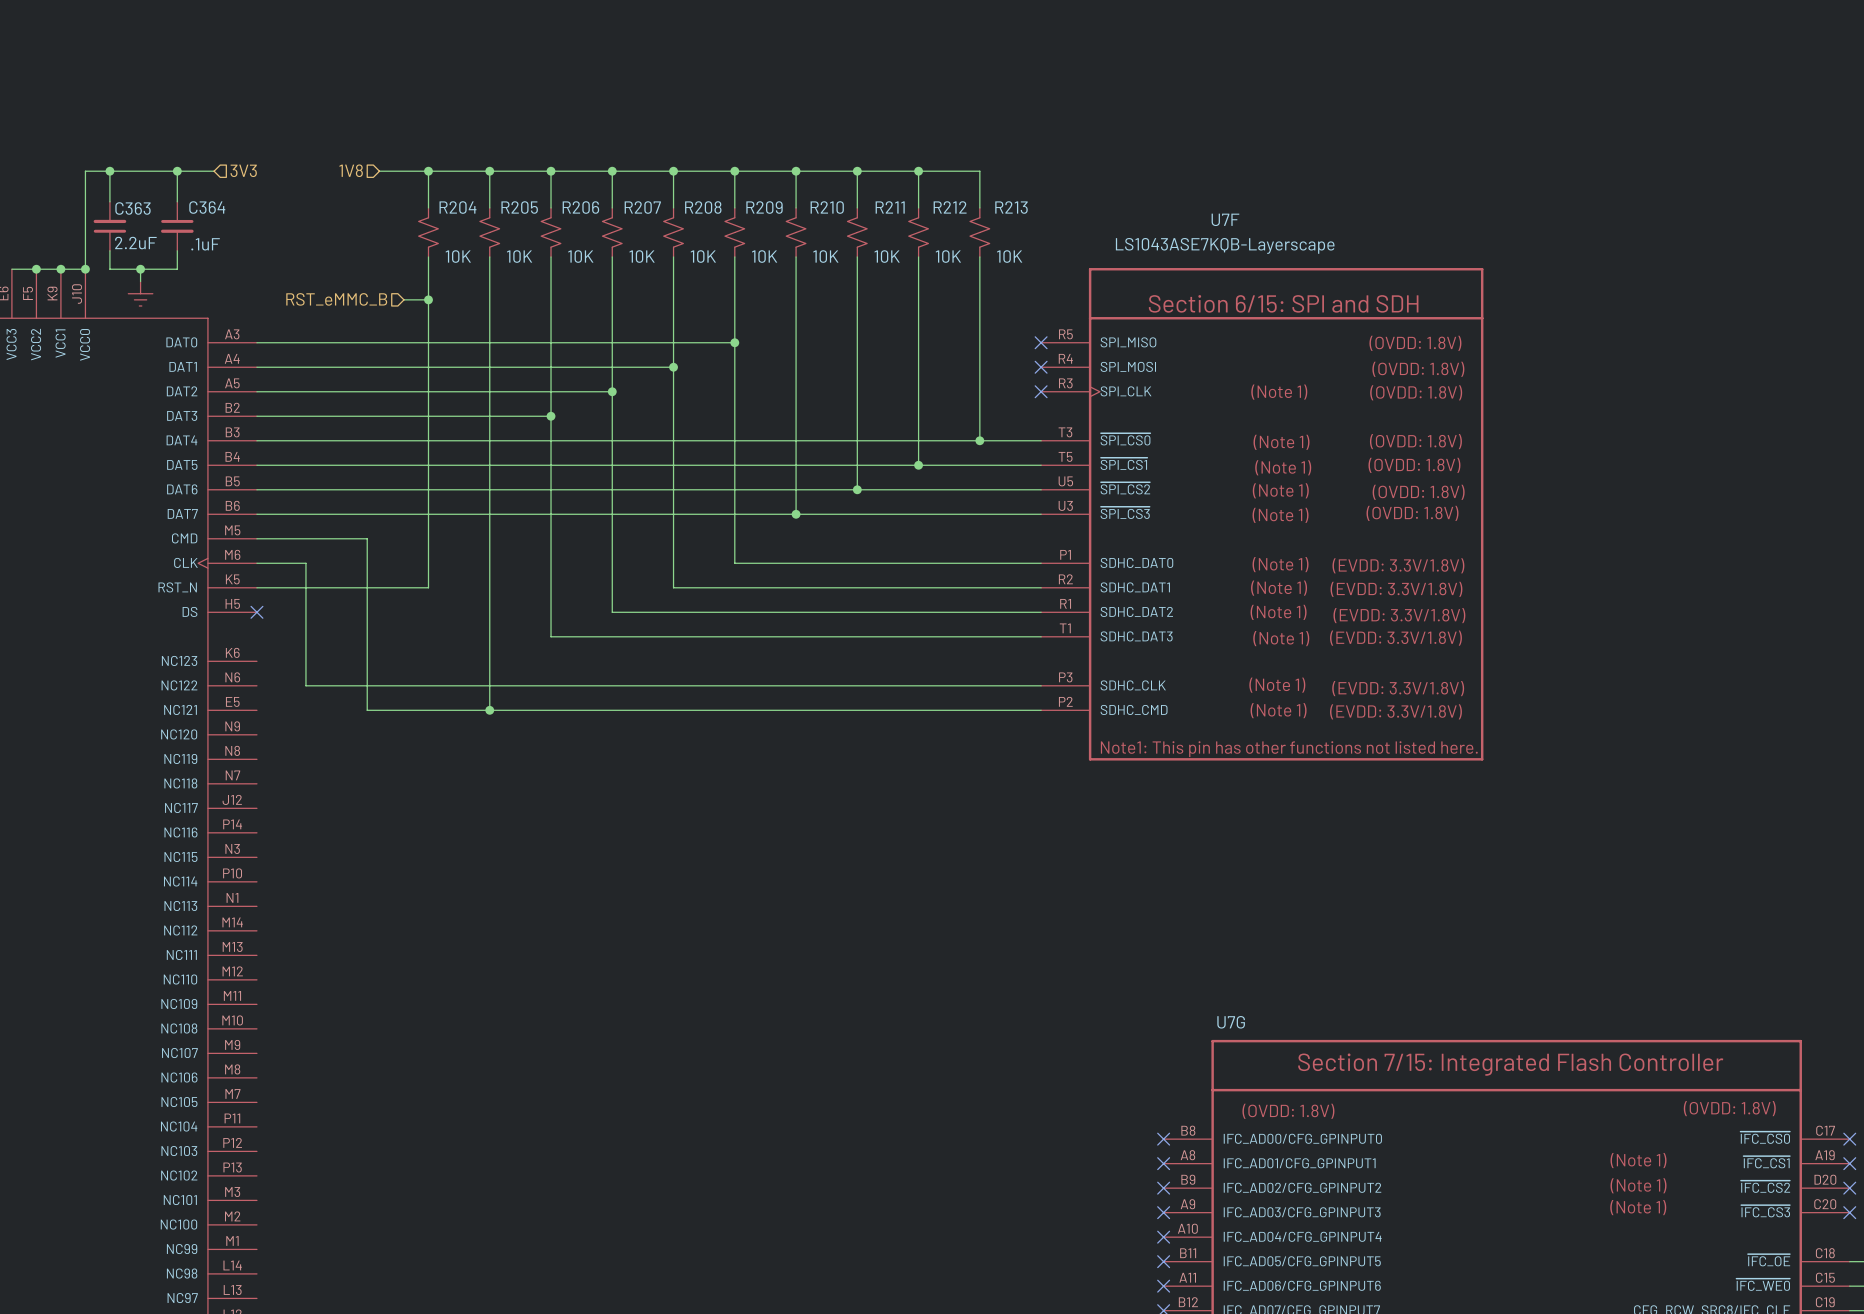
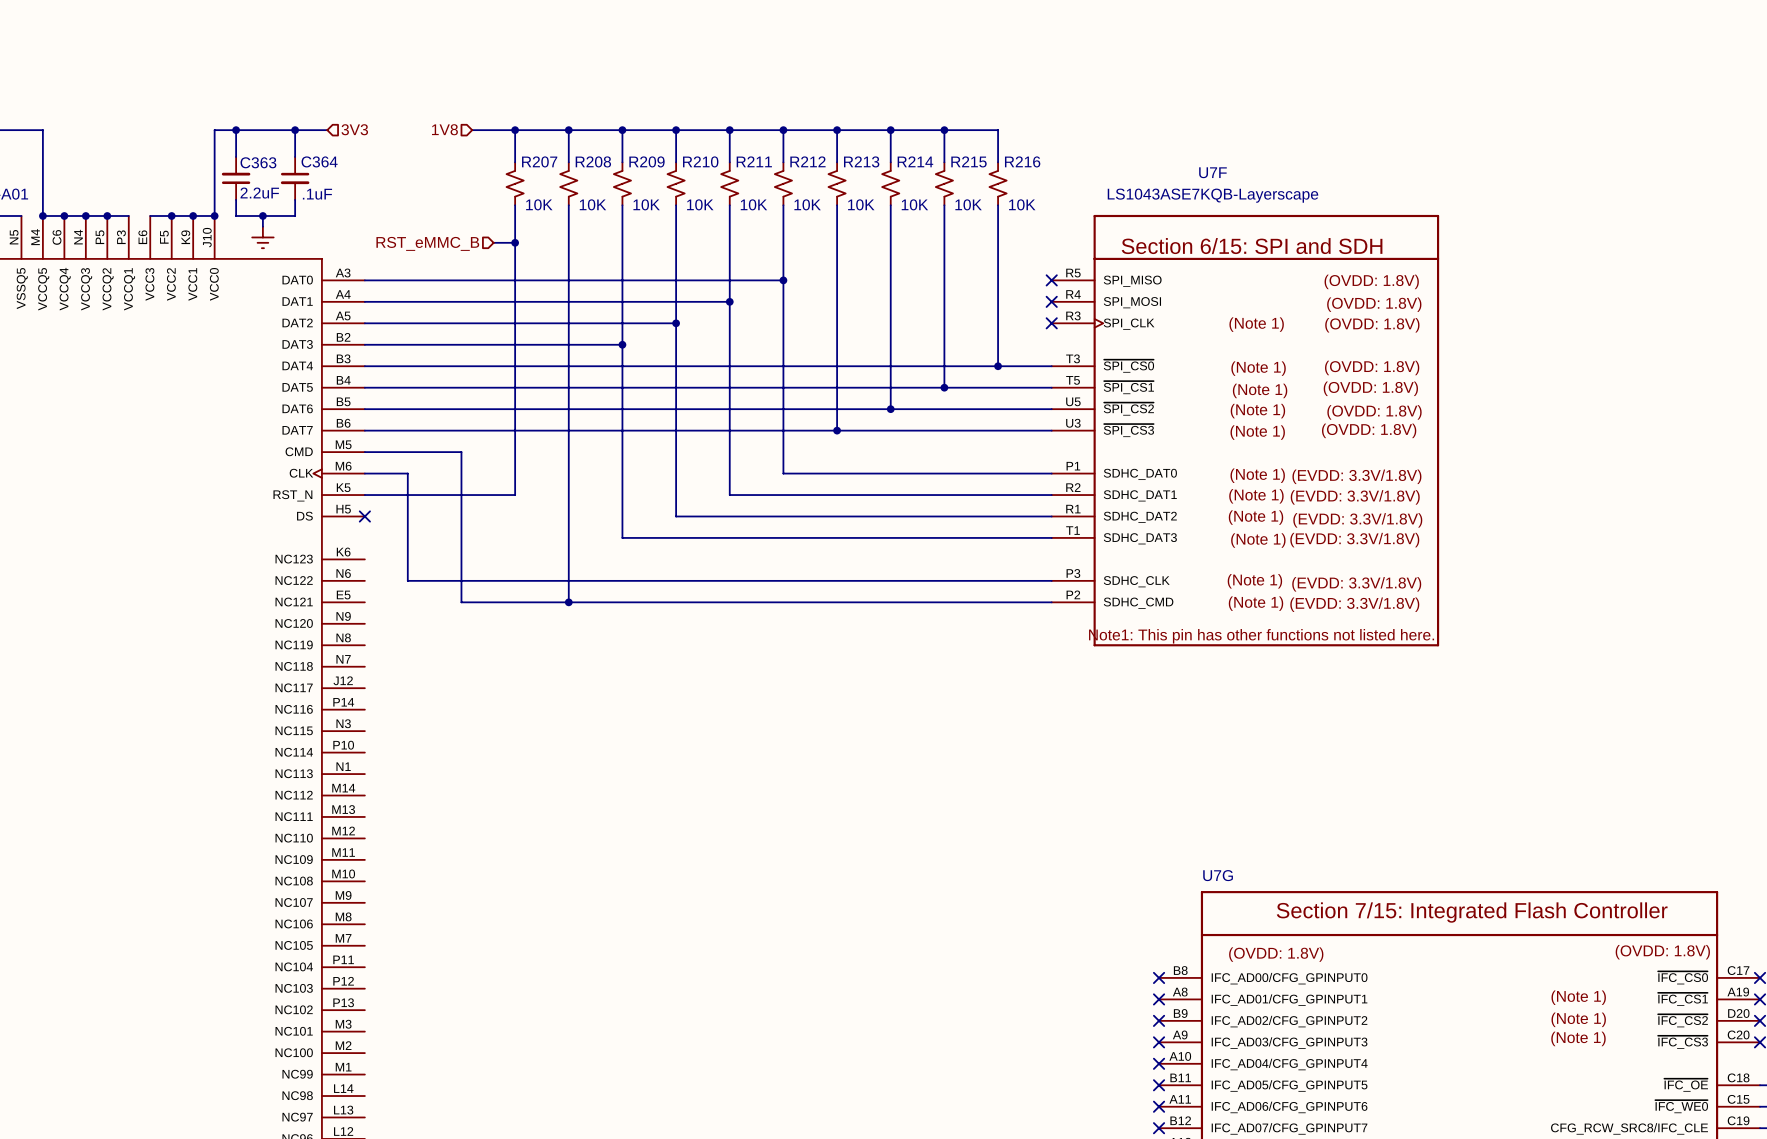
R204 name: R204 (457, 207) -> R207 (539, 161)
R205 name: R205 (519, 207) -> R208 (593, 161)
R206 name: R206 (580, 207) -> R209 (646, 161)
R207 name: R207 (642, 207) -> R210 (700, 161)
R208 name: R208 (703, 207) -> R211 (754, 161)
R209 name: R209 (764, 207) -> R212 (807, 161)
R210 name: R210 (827, 207) -> R213 (861, 161)
R211 name: R211 (890, 207) -> R214 (915, 161)
R212 name: R212 (950, 207) -> R215 (968, 161)
R213 name: R213 (1011, 207) -> R216 (1022, 161)

